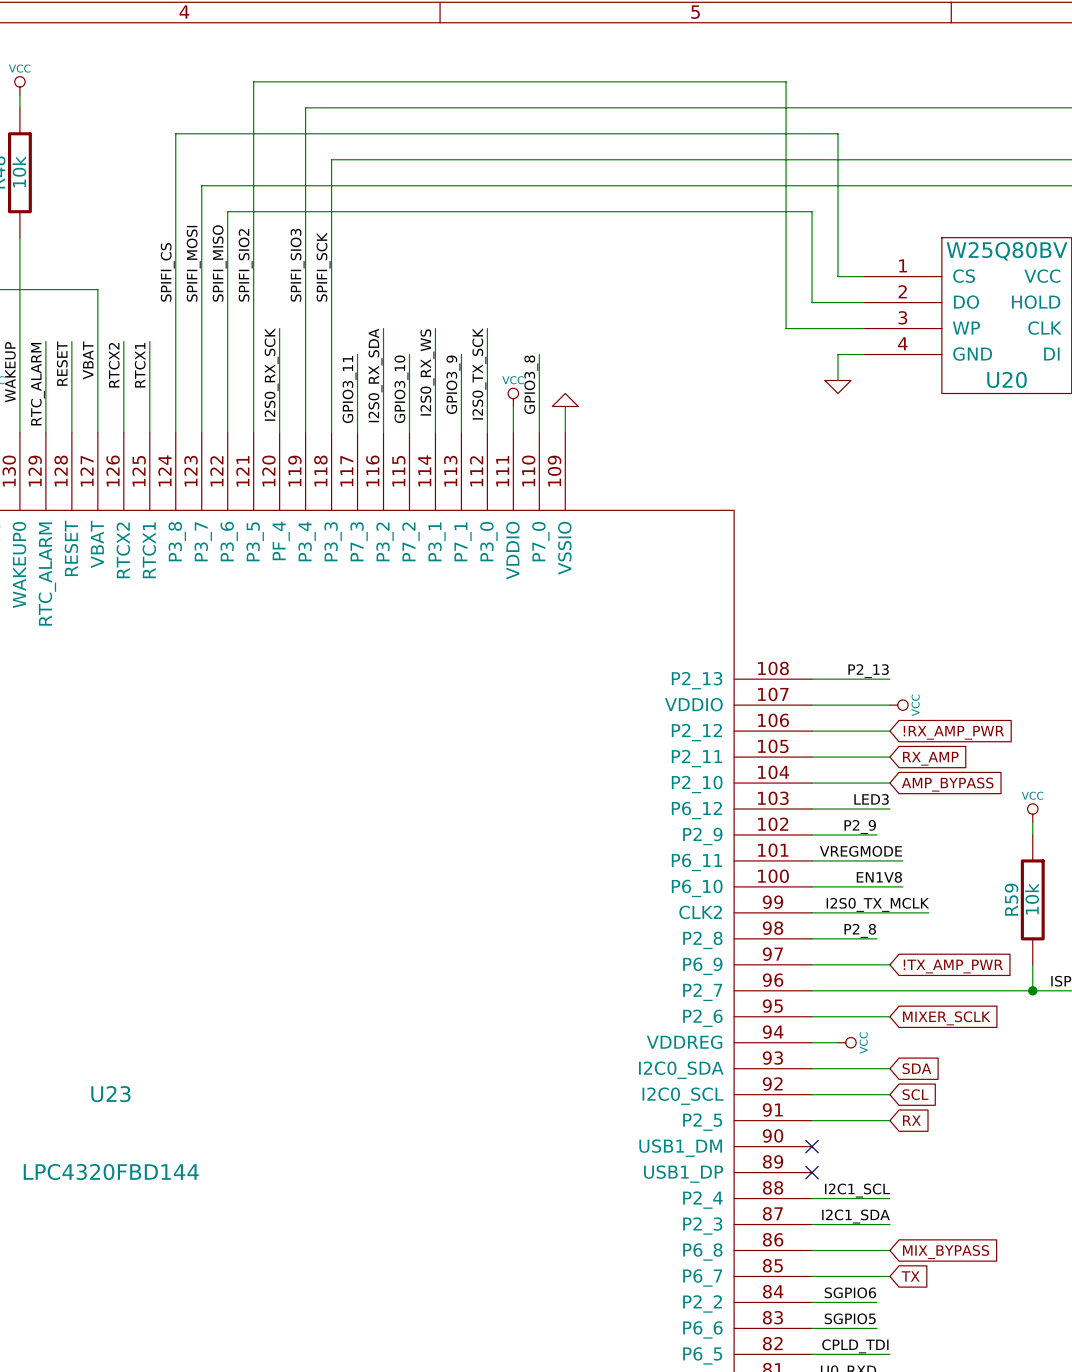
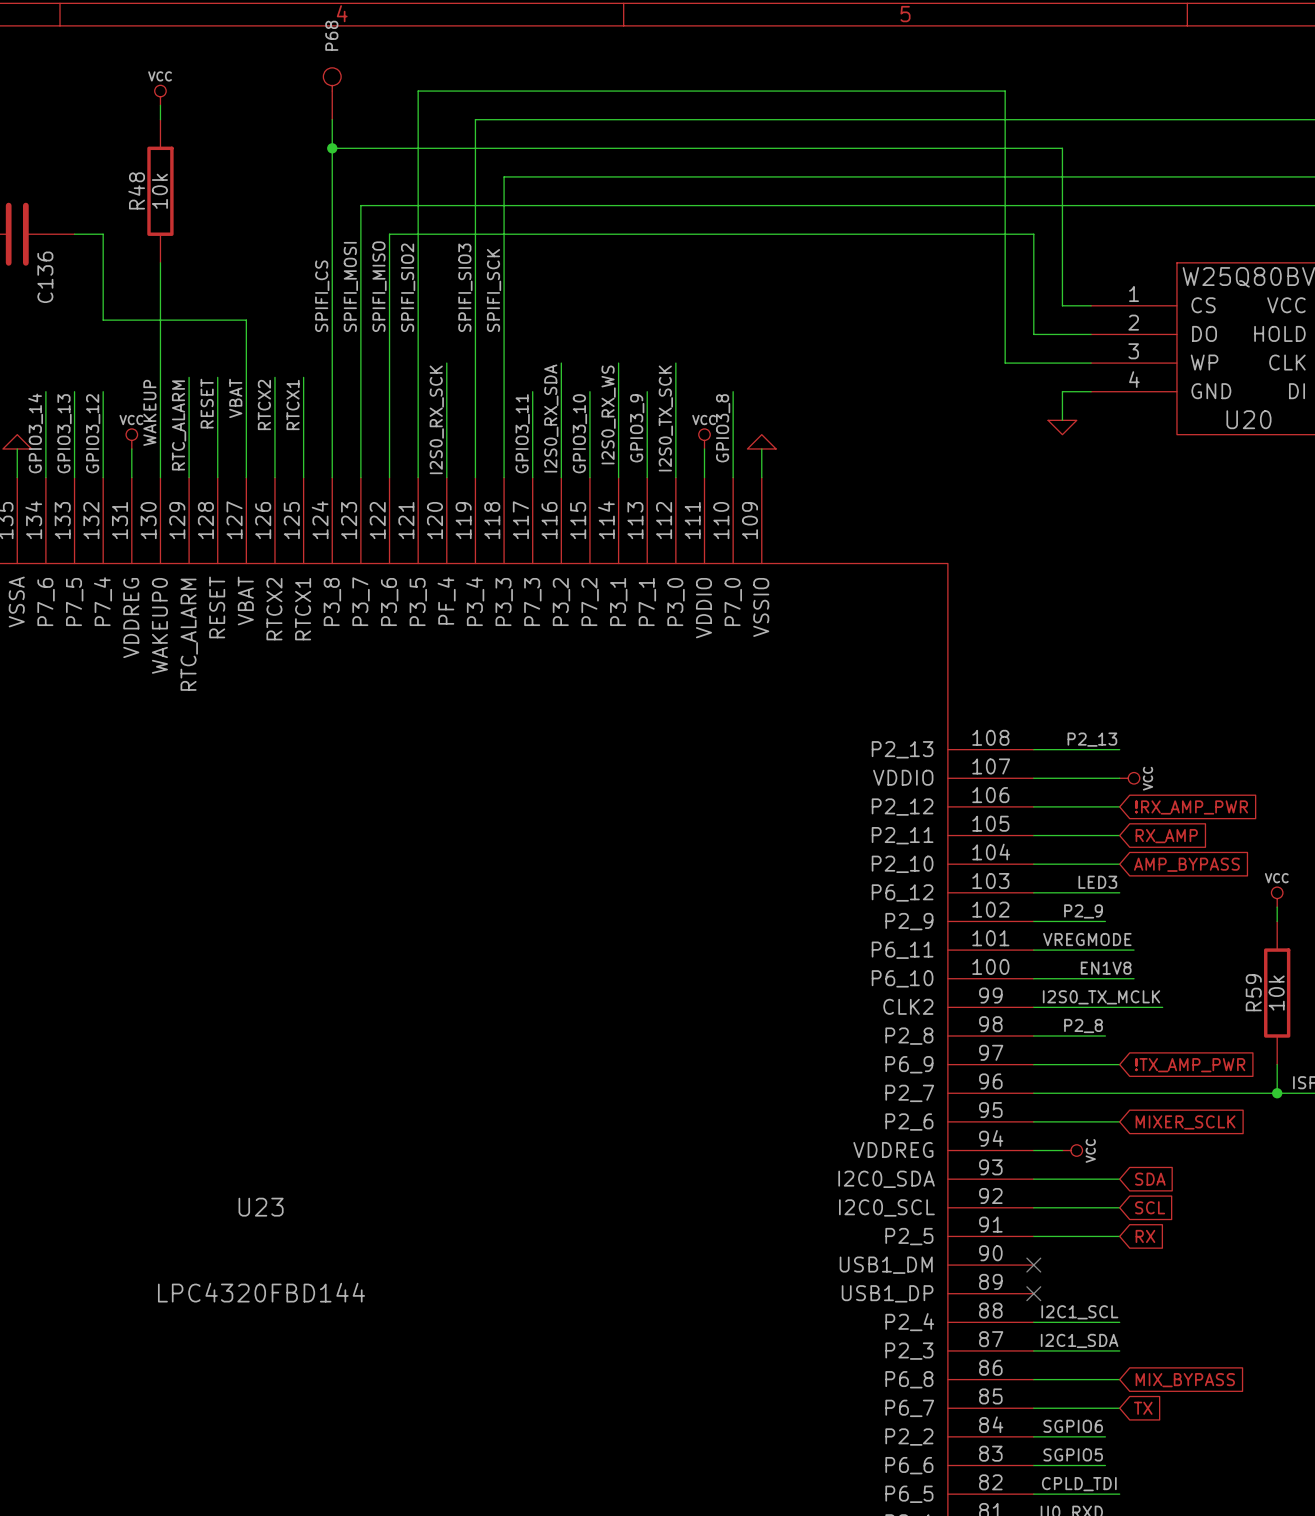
P68: none -> (332, 93)
wire: none -> (332, 119) (332, 148)
junction: none -> (332, 148)

